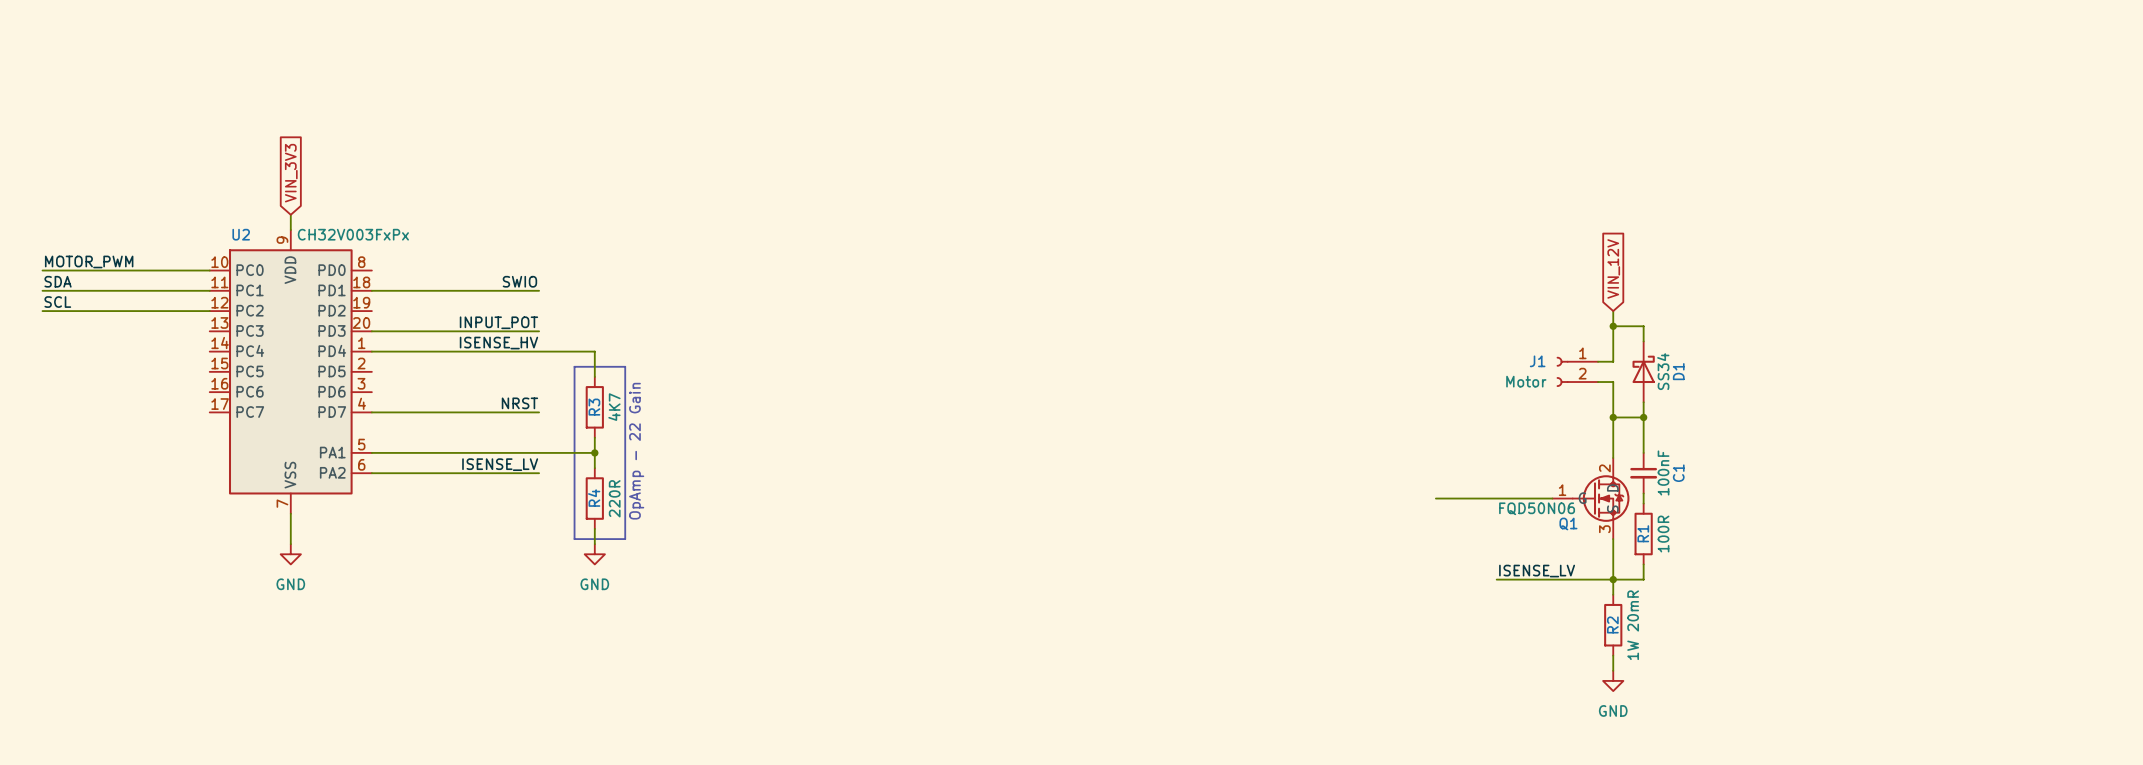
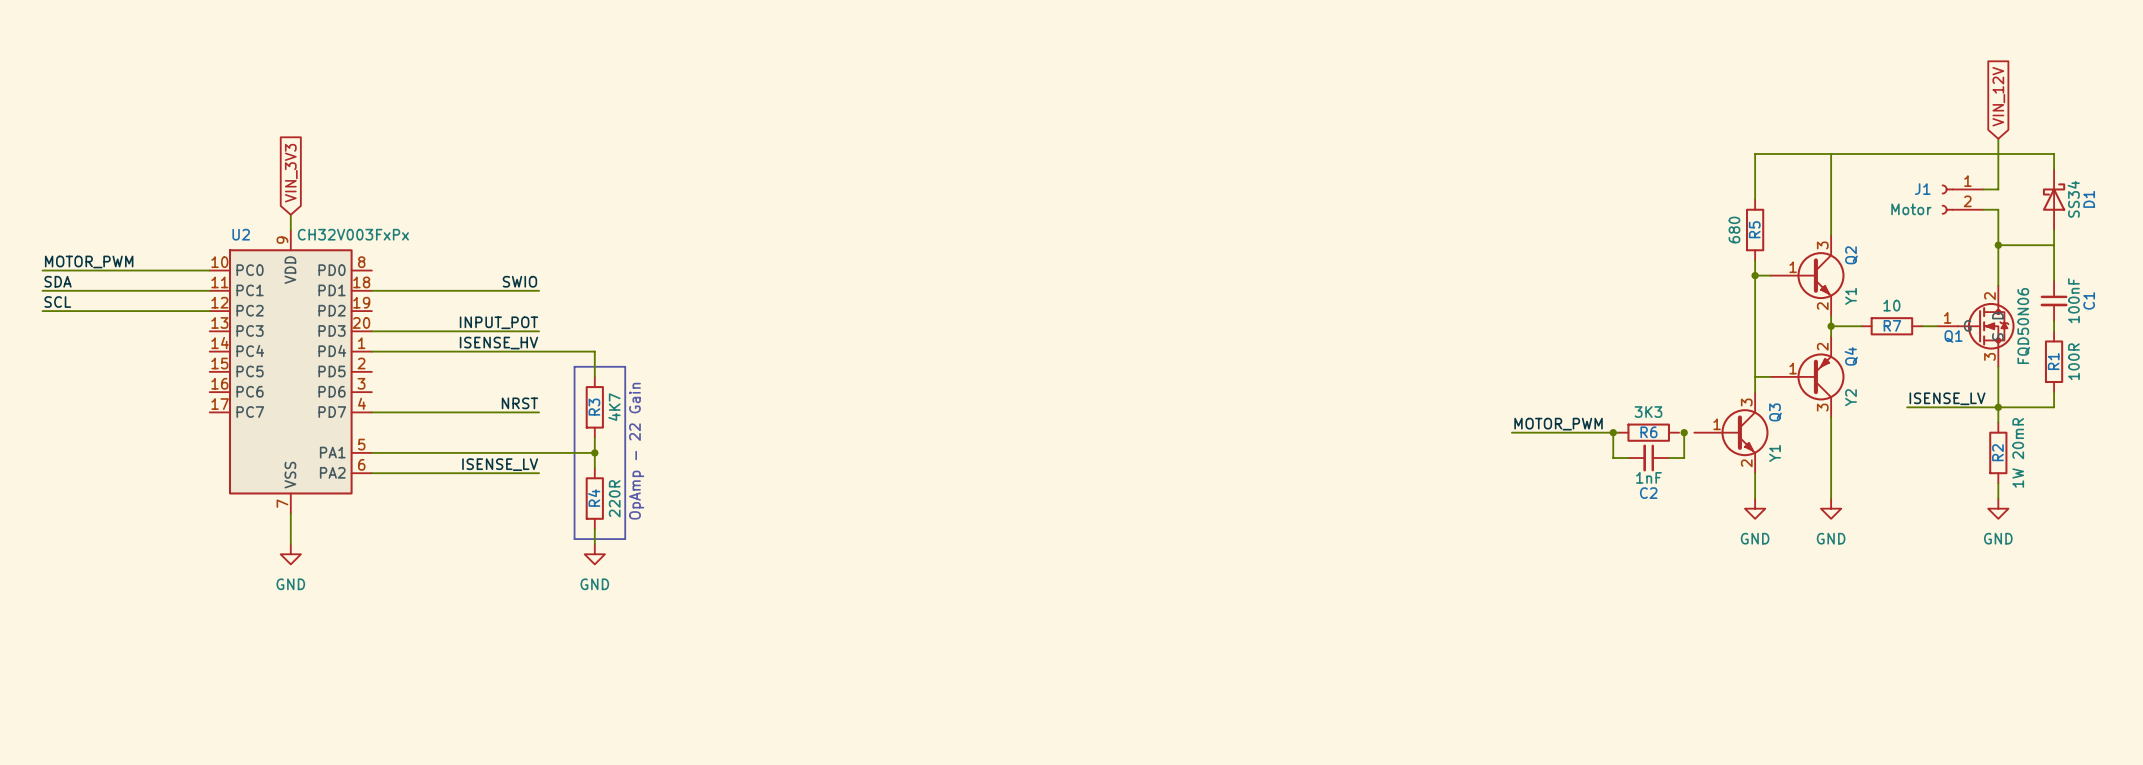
global label: none -> VIN_12V (1998, 96)
wire: none -> (1998, 138) (1998, 189) (1983, 189)
wire: none -> (1831, 153) (1831, 235)
wire: none -> (2054, 169) (2054, 153) (1755, 153) (1755, 199)
wire: none -> (1983, 209) (1998, 209) (1998, 285)
R5: none -> 680 (1755, 230)
wire: none -> (2054, 230) (2054, 280)
wire: none -> (1998, 245) (2054, 245)
junction: none -> (1998, 245)
wire: none -> (1755, 260) (1755, 392)
global label: VIN_12V (1613, 268) -> none
wire: none -> (1755, 275) (1770, 275)
junction: none -> (1755, 275)
Q2: none -> Y1 (1807, 275)
wire: (1613, 311) (1613, 361) (1598, 361) -> none
wire: none -> (1831, 316) (1831, 336)
wire: none -> (2054, 321) (2054, 331)
wire: (1613, 326) (1643, 326) (1643, 341) -> none
junction: (1613, 326) -> none
wire: none -> (1831, 326) (1861, 326)
junction: none -> (1831, 326)
R7: none -> 10 (1891, 326)
wire: none -> (1922, 326) (1937, 326)
wire: none -> (1998, 366) (1998, 422)
J1 position: (1577, 371) -> (1962, 199)
D1 position: (1643, 371) -> (2054, 199)
wire: none -> (1755, 376) (1770, 376)
Q4: none -> Y2 (1807, 376)
wire: (1598, 382) (1613, 382) (1613, 432) -> none
wire: none -> (2054, 392) (2054, 407) (1907, 407)
label: none -> ISENSE_LV (1947, 398)
wire: (1643, 402) (1643, 452) -> none
junction: none -> (1998, 407)
wire: (1613, 417) (1643, 417) -> none
junction position: (1613, 417) -> (1613, 432)
junction: (1643, 417) -> none
wire: none -> (1831, 417) (1831, 498)
label: none -> MOTOR_PWM (1558, 424)
wire: none -> (1511, 432) (1618, 432)
R6: none -> 3K3 (1648, 432)
wire: none -> (1684, 432) (1684, 458) (1668, 458)
junction: none -> (1684, 432)
Q3: none -> Y1 (1731, 432)
wire: none -> (1613, 458) (1628, 458)
C2: none -> 1nF (1648, 458)
C1 position: (1643, 473) -> (2054, 300)
wire: none -> (1755, 473) (1755, 498)
wire: none -> (1998, 483) (1998, 498)
wire: (1643, 493) (1643, 503) -> none
wire: (1435, 498) (1552, 498) -> none
Q1 position: (1590, 498) -> (1976, 326)
Q1 value rotation: 0° (1537, 508) -> 90° counterclockwise (2023, 326)
Q1 value position: FQD50N06 (1537, 508) -> FQD50N06 (2023, 326)
power symbol: none -> GND (1755, 508)
power symbol: none -> GND (1831, 508)
power symbol: none -> GND (1998, 508)
Q1 name position: Q1 (1568, 523) -> Q1 (1953, 336)
R1 position: (1643, 534) -> (2054, 361)
wire: (1613, 539) (1613, 594) -> none
wire: (1643, 564) (1643, 579) (1496, 579) -> none
label: ISENSE_LV (1537, 571) -> none
junction: (1613, 579) -> none
R2 position: (1613, 625) -> (1998, 452)
wire: (1613, 655) (1613, 670) -> none
power symbol: GND (1613, 680) -> none

